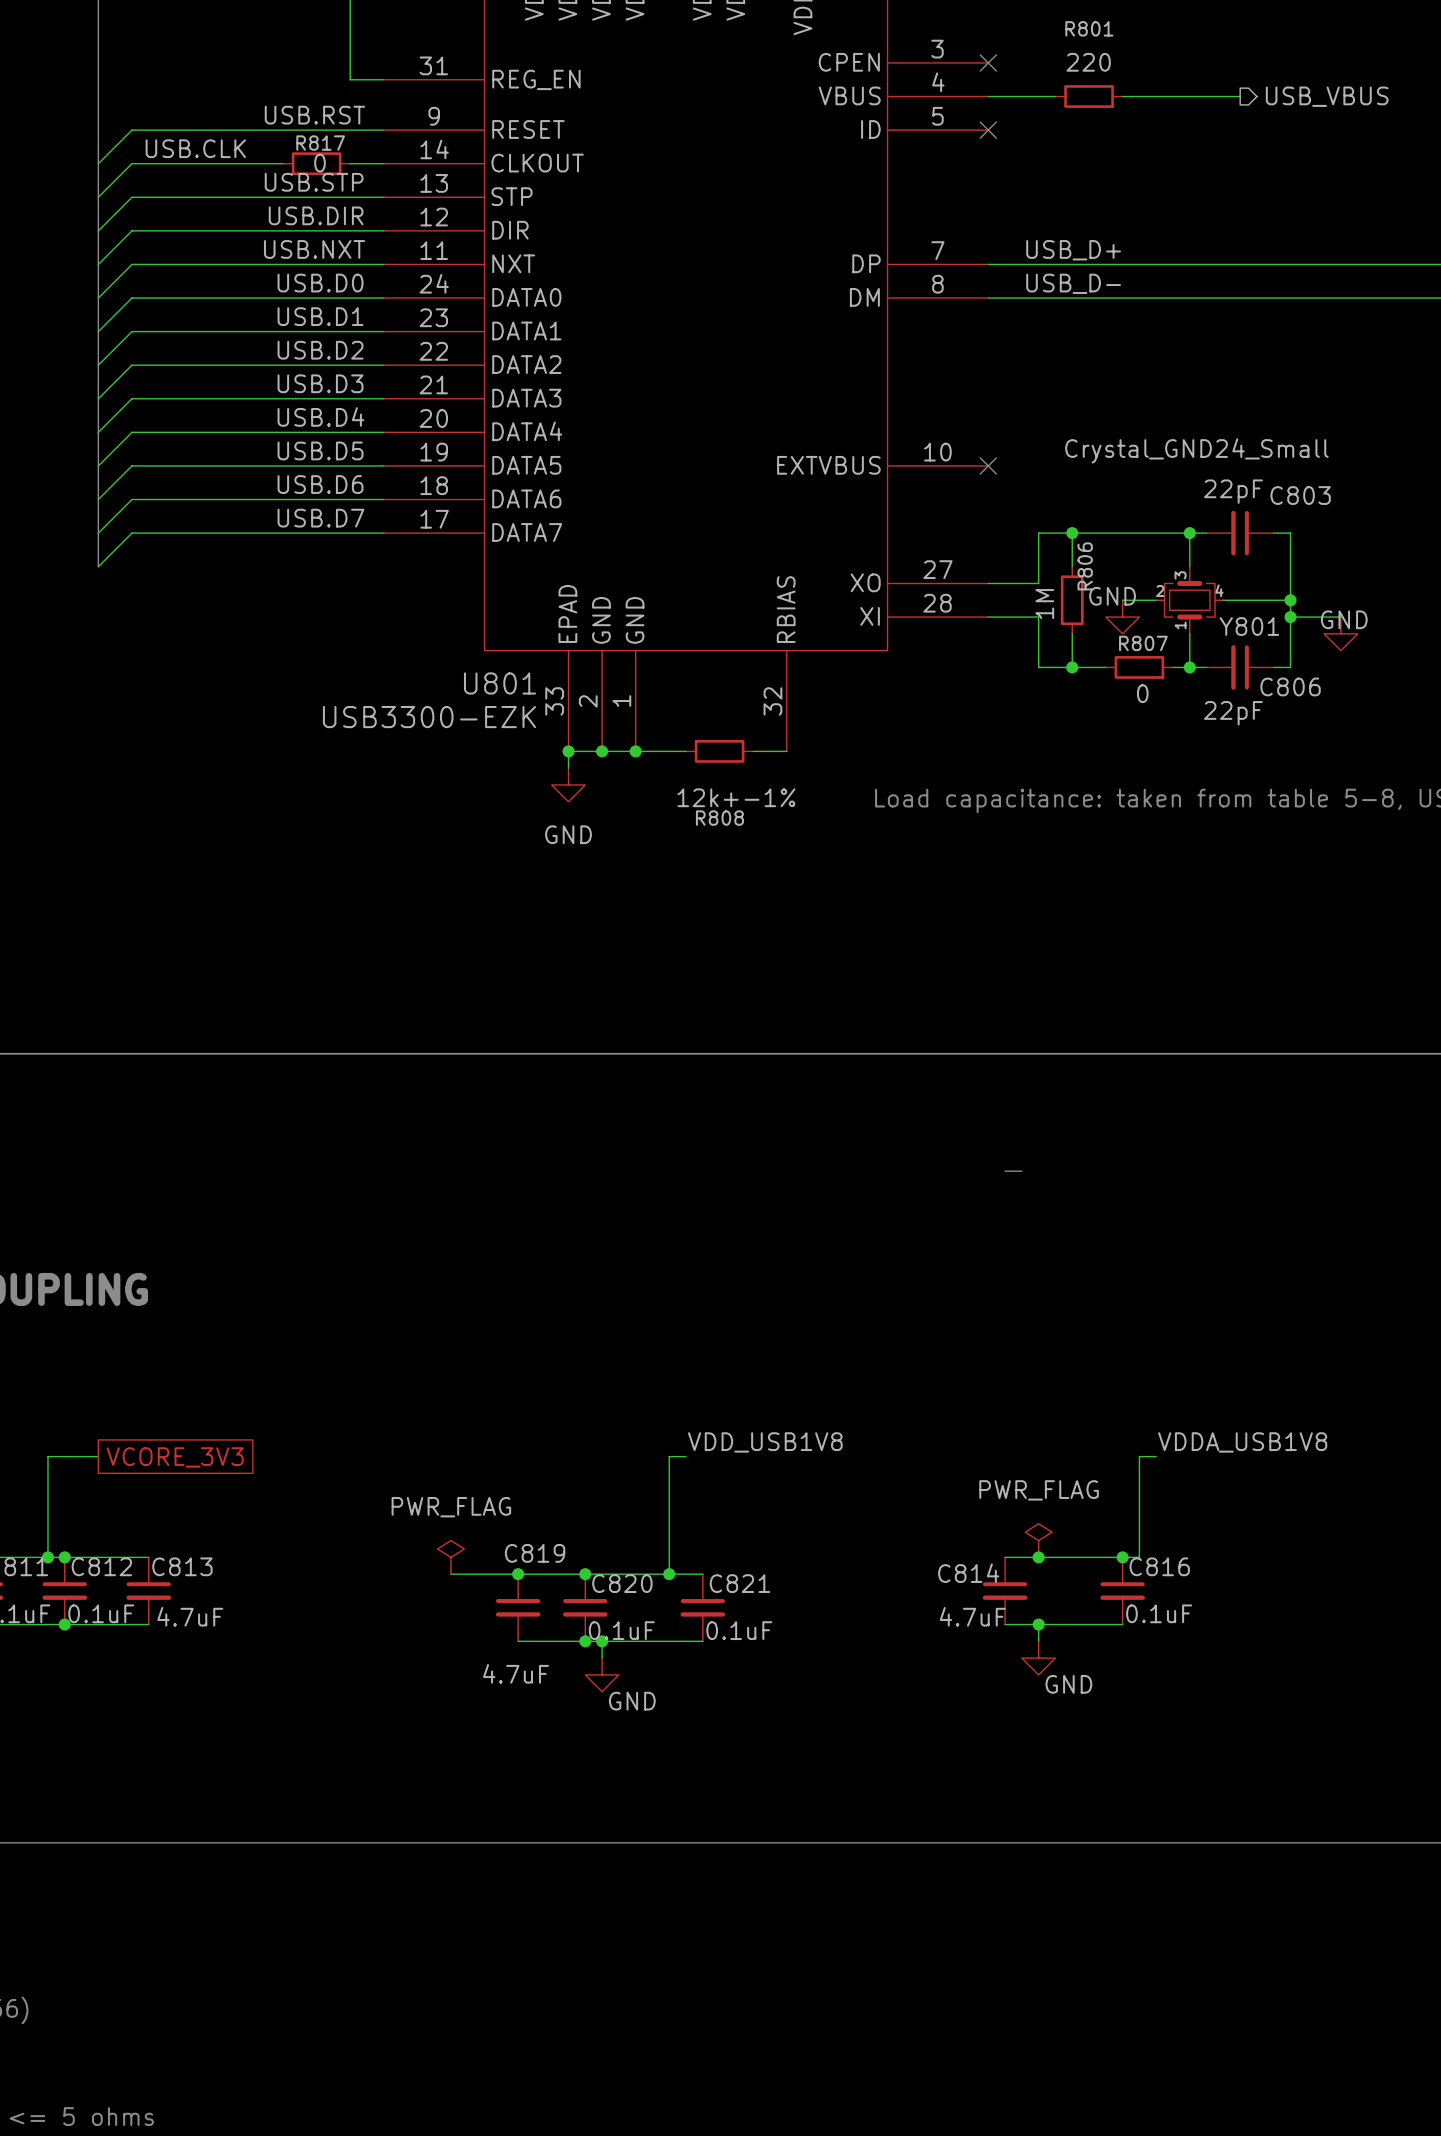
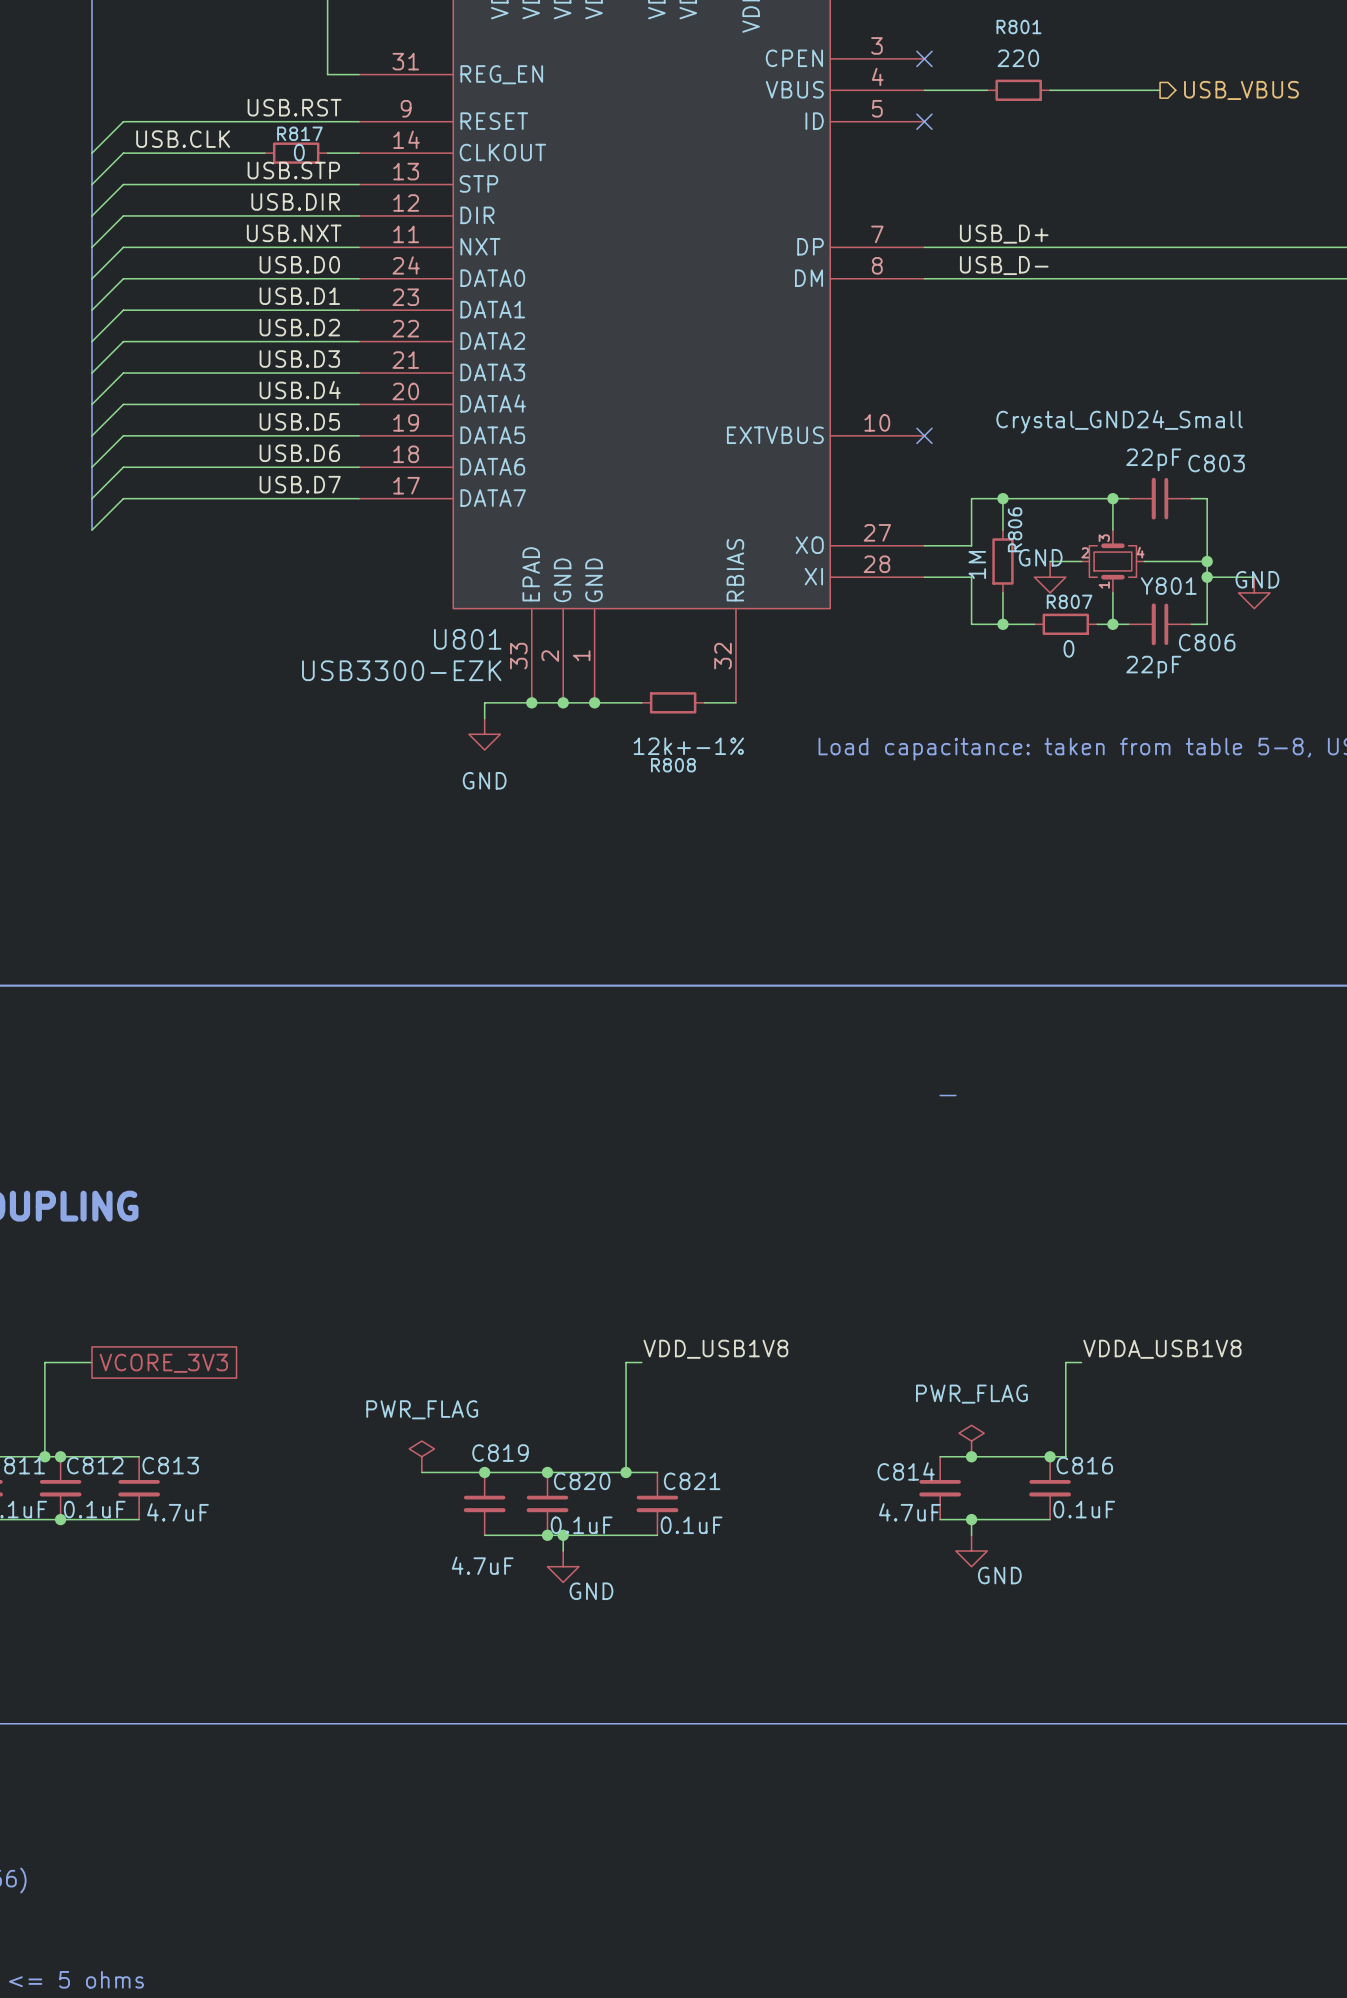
wire: (568, 751) (568, 768) -> (531, 702) (484, 702) (484, 718)
power symbol position: GND (568, 784) -> GND (484, 734)

